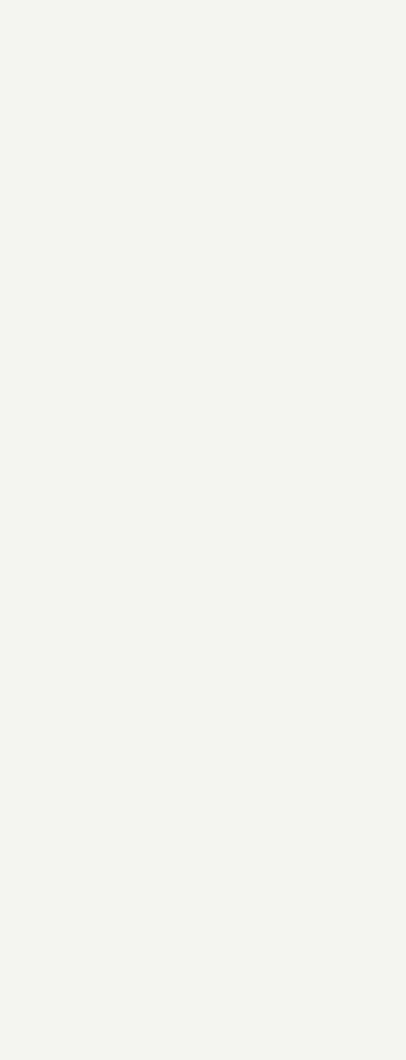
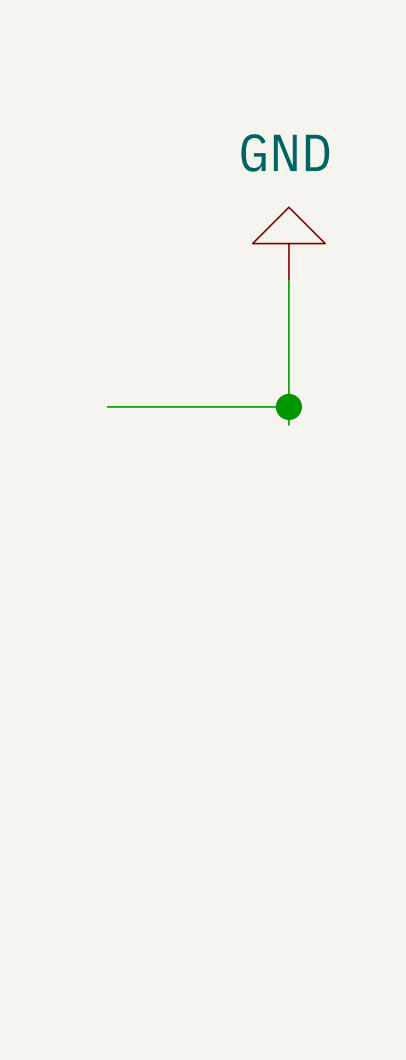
power symbol: none -> GND (288, 243)
wire: none -> (288, 279) (288, 425)
wire: none -> (107, 406) (288, 406)
junction: none -> (288, 406)

